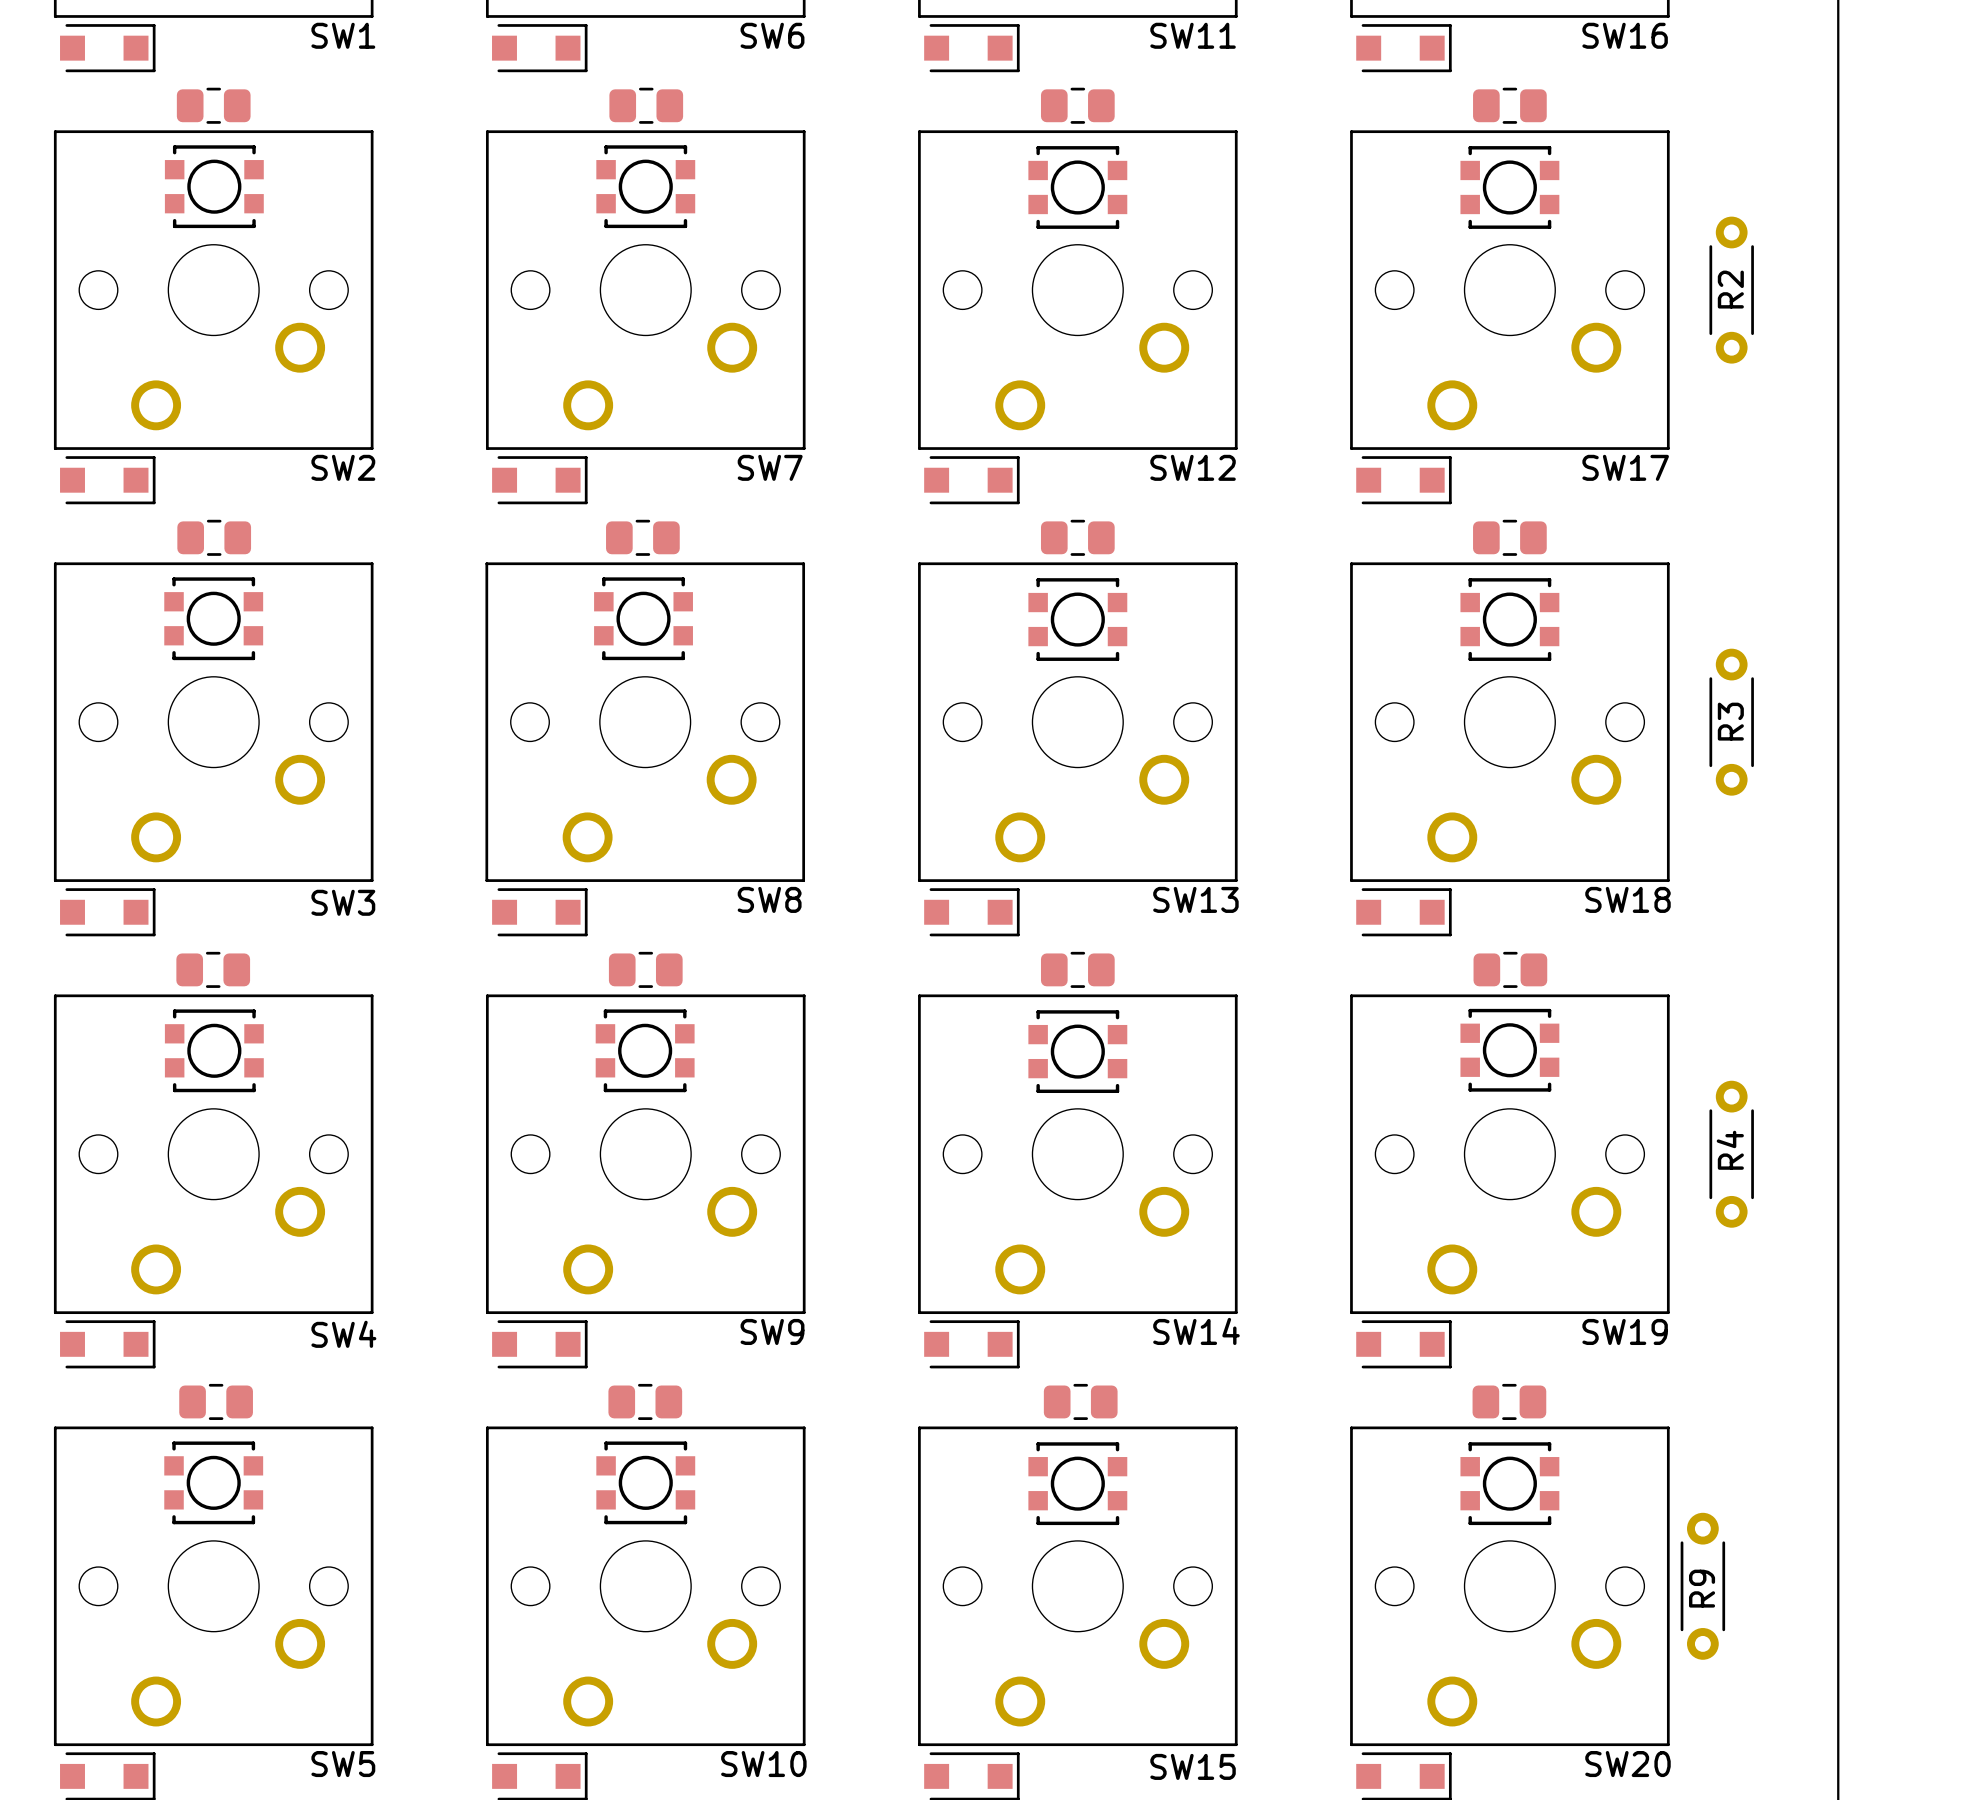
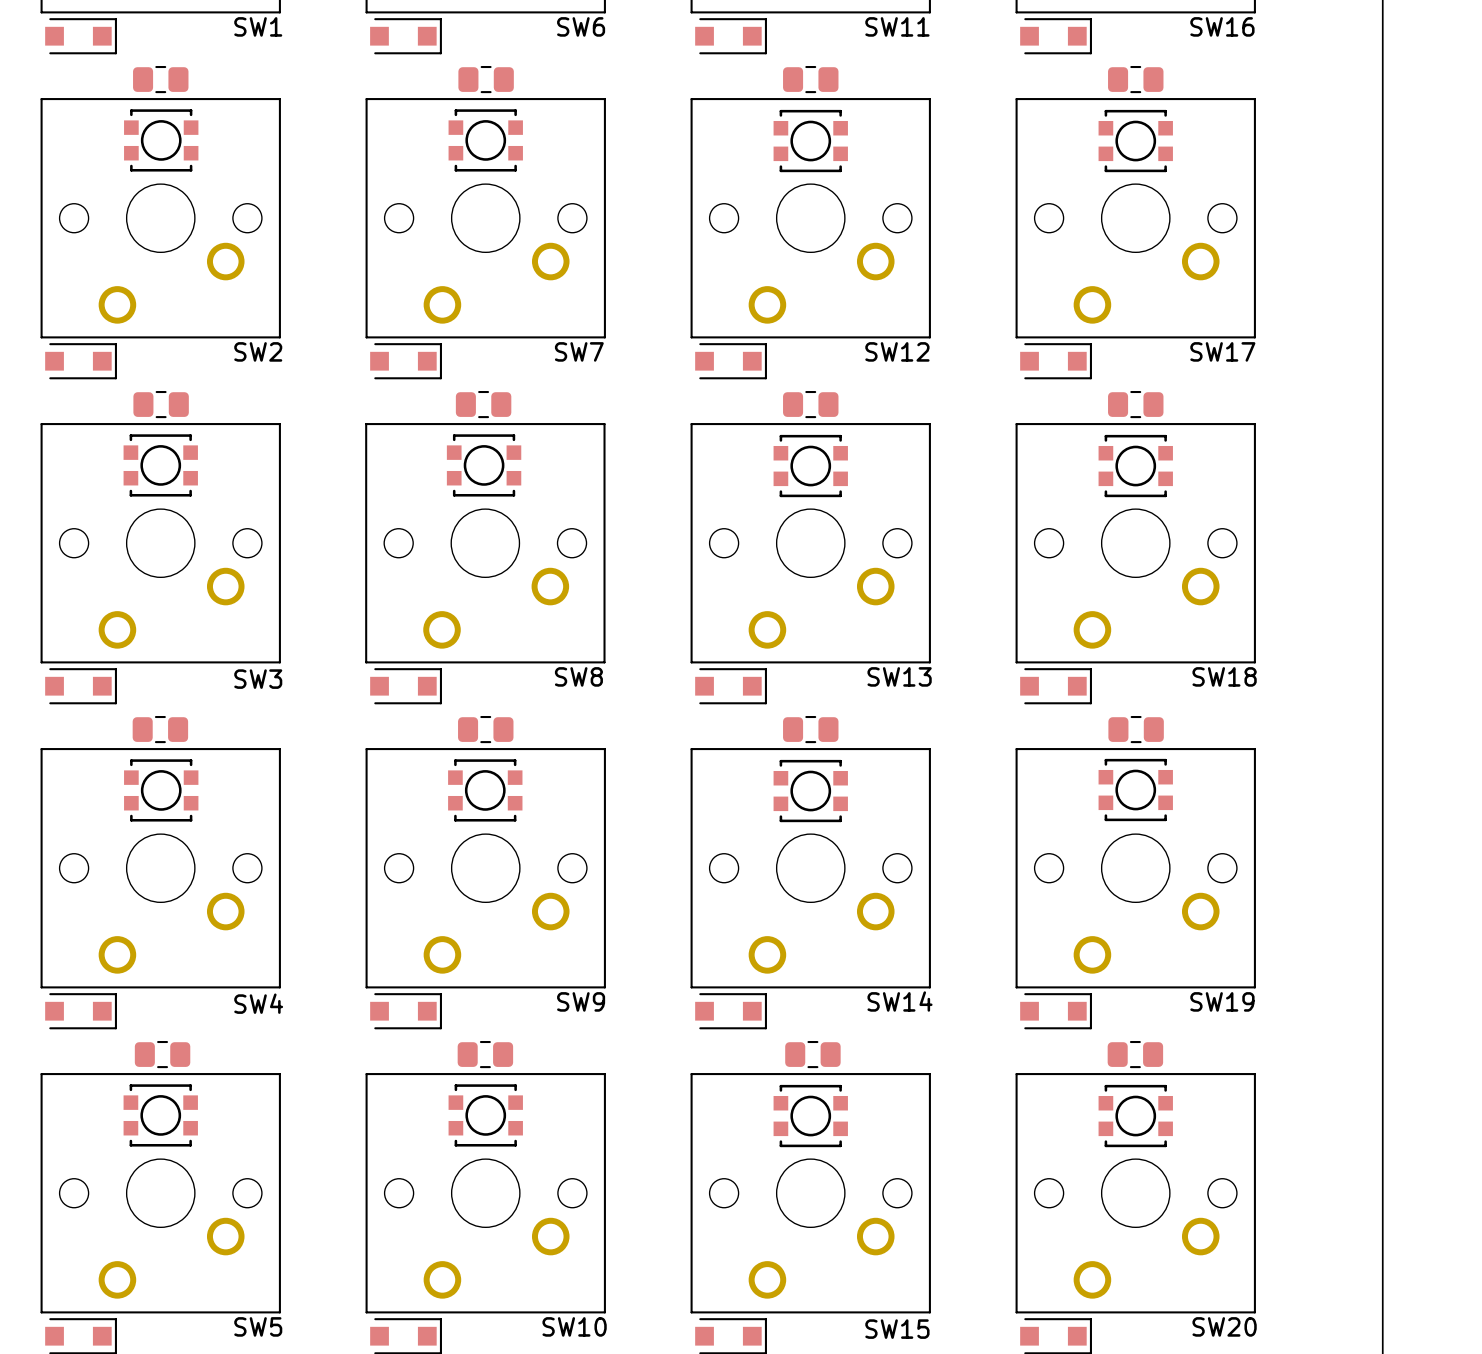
R2: (1731, 290) -> none
R3: (1731, 722) -> none
R4: (1731, 1154) -> none
R9: (1702, 1586) -> none

